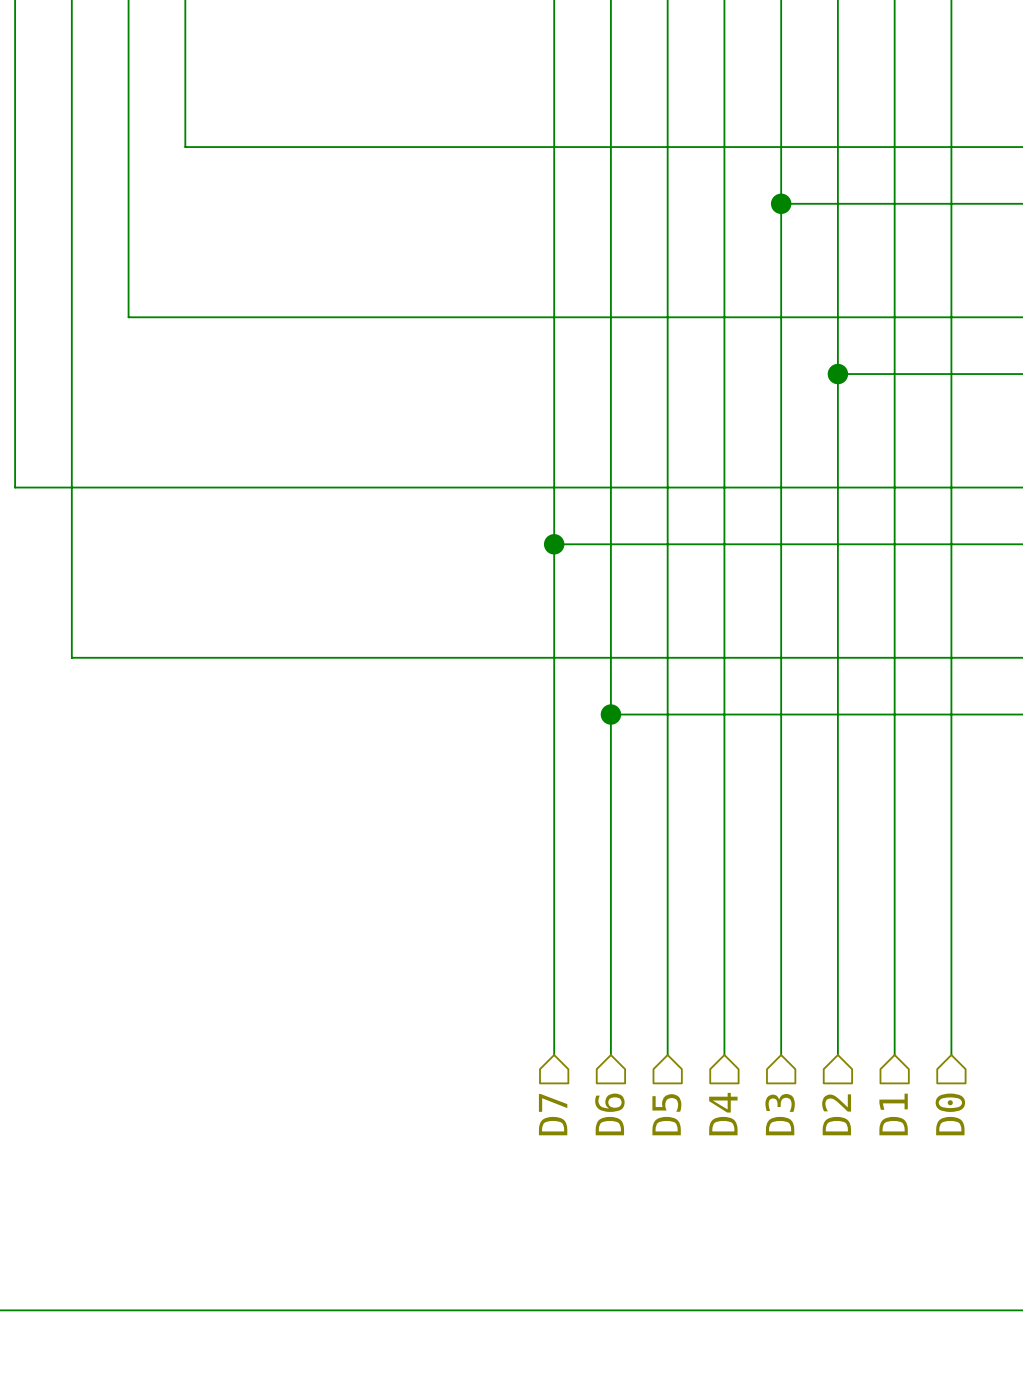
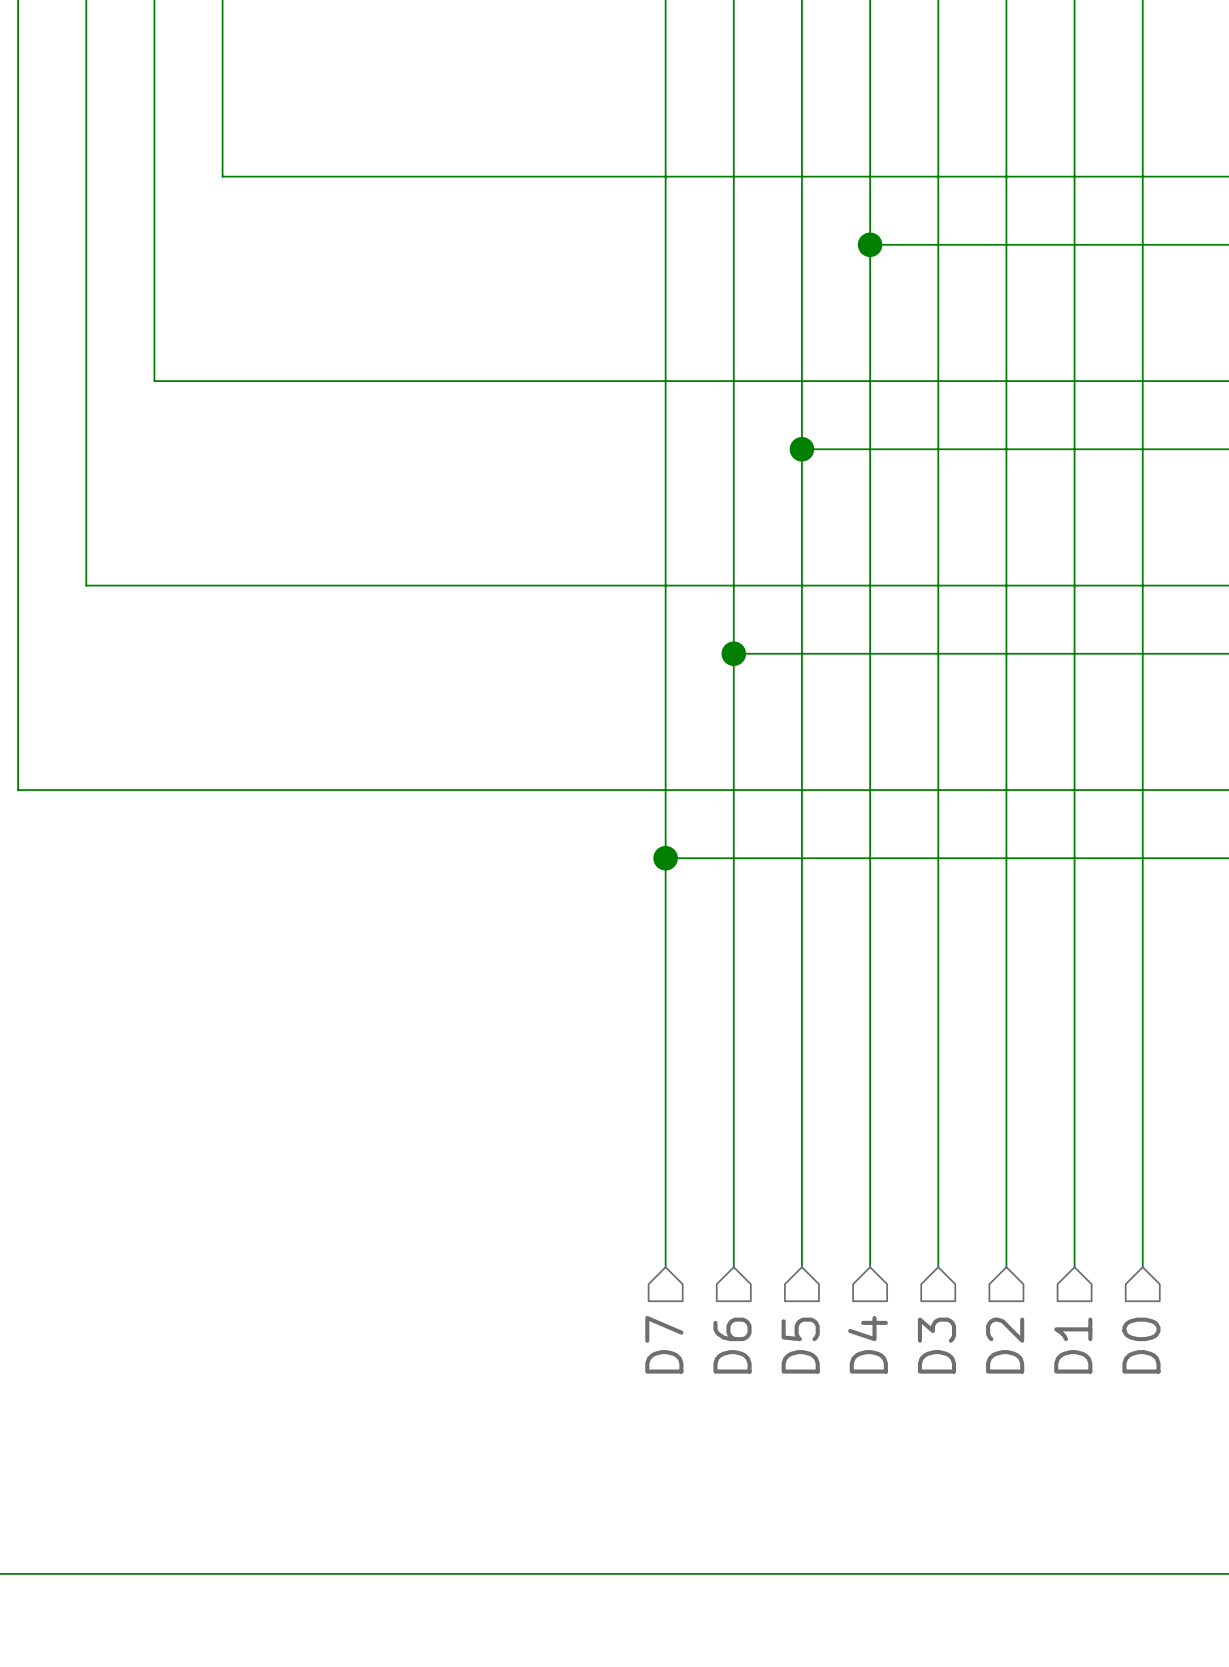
wire: none -> (870, 244) (938, 244)
junction position: (781, 203) -> (870, 244)
wire: none -> (801, 449) (1006, 449)
junction: none -> (801, 449)
junction: (837, 374) -> none
wire: (15, 487) (71, 487) (71, 657) -> (18, 585) (18, 790) (86, 790)
wire: (554, 544) (610, 544) -> (665, 858) (733, 858)
junction position: (554, 544) -> (733, 653)
junction position: (610, 714) -> (665, 858)

